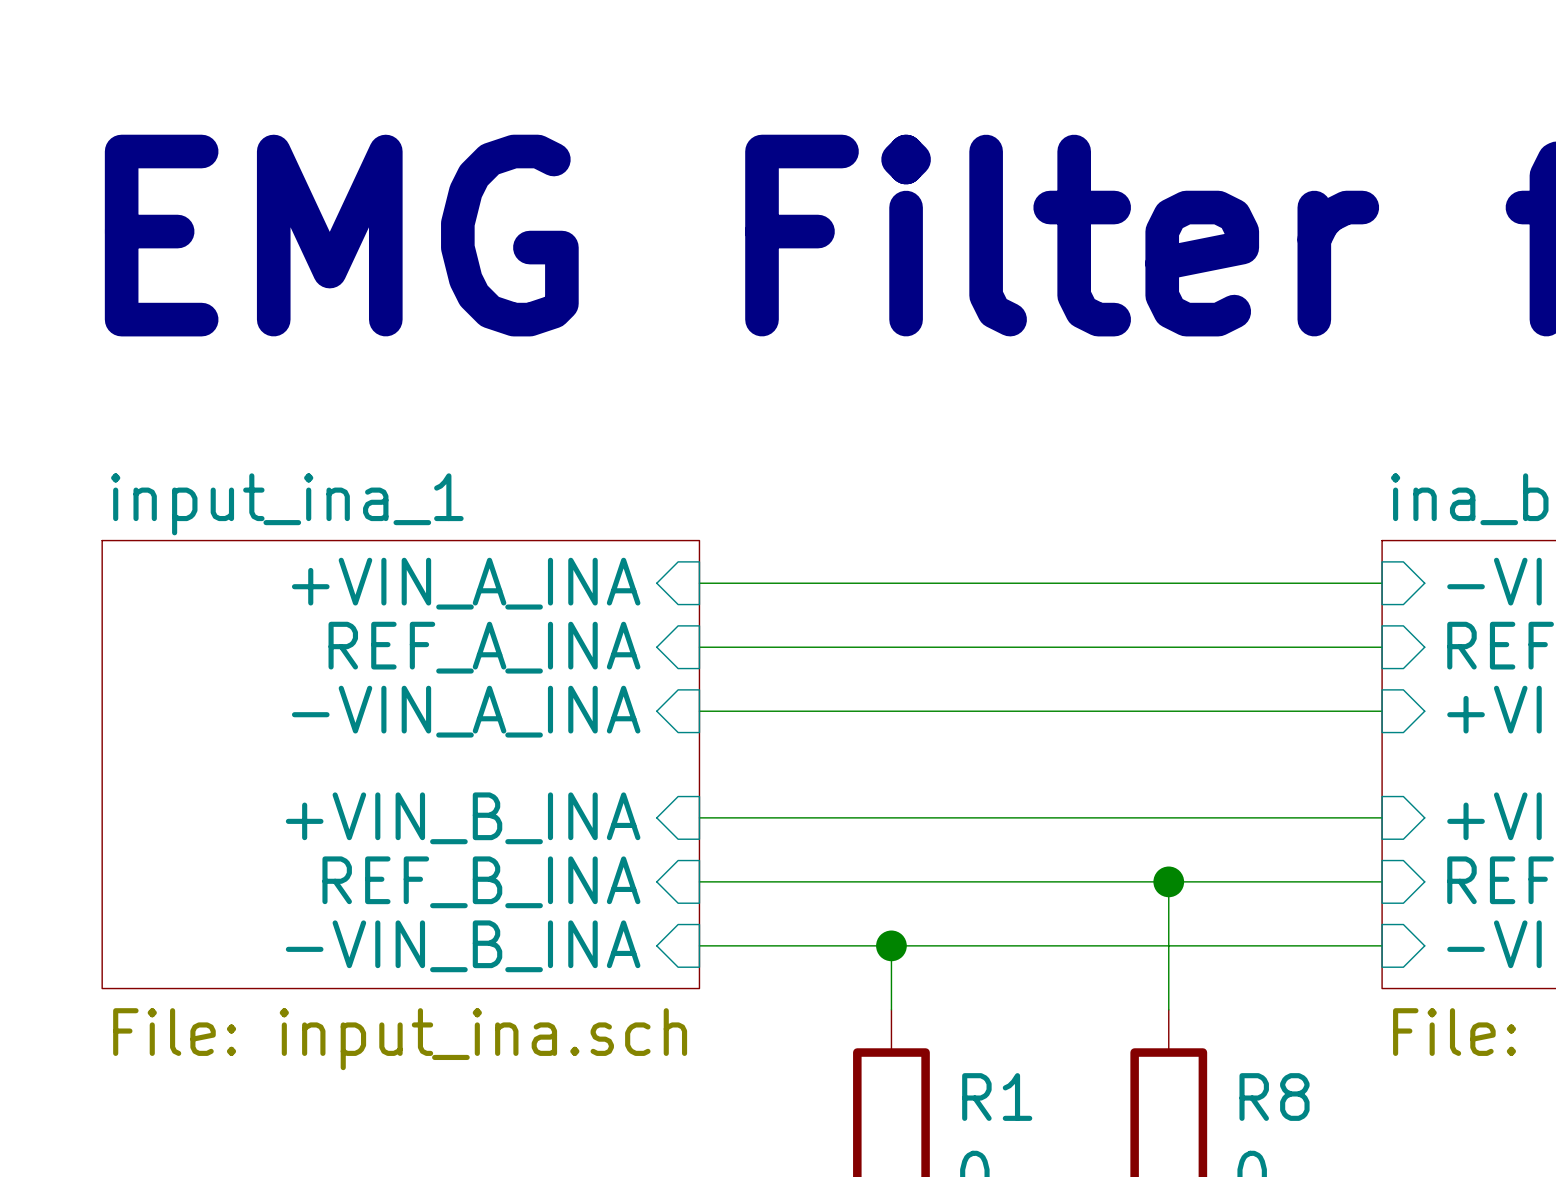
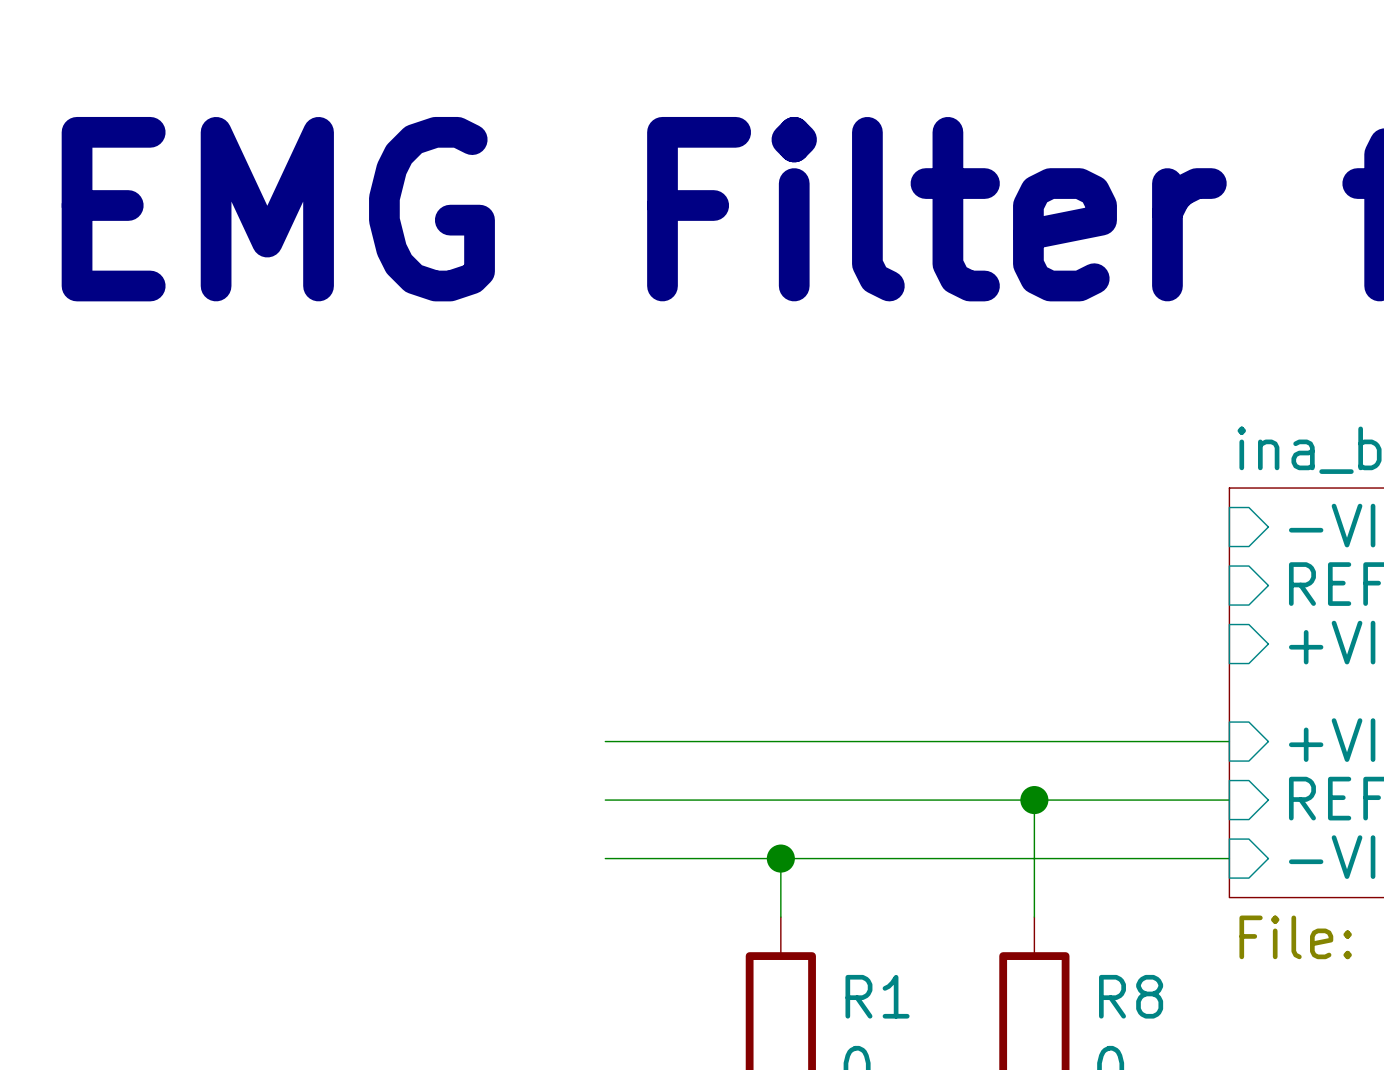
sheet pin: +VIN_A_INA (466, 583) -> none
wire: (699, 583) (1382, 583) -> none
sheet pin: REF_A_INA (484, 647) -> none
wire: (699, 647) (1382, 647) -> none
sheet pin: -VIN_A_INA (466, 711) -> none
wire: (699, 711) (1382, 711) -> none
sheet input_ina_1: File: input_ina.sch (400, 764) -> none
sheet pin: +VIN_B_INA (463, 818) -> none
sheet pin: REF_B_INA (481, 882) -> none
sheet pin: -VIN_B_INA (463, 946) -> none

